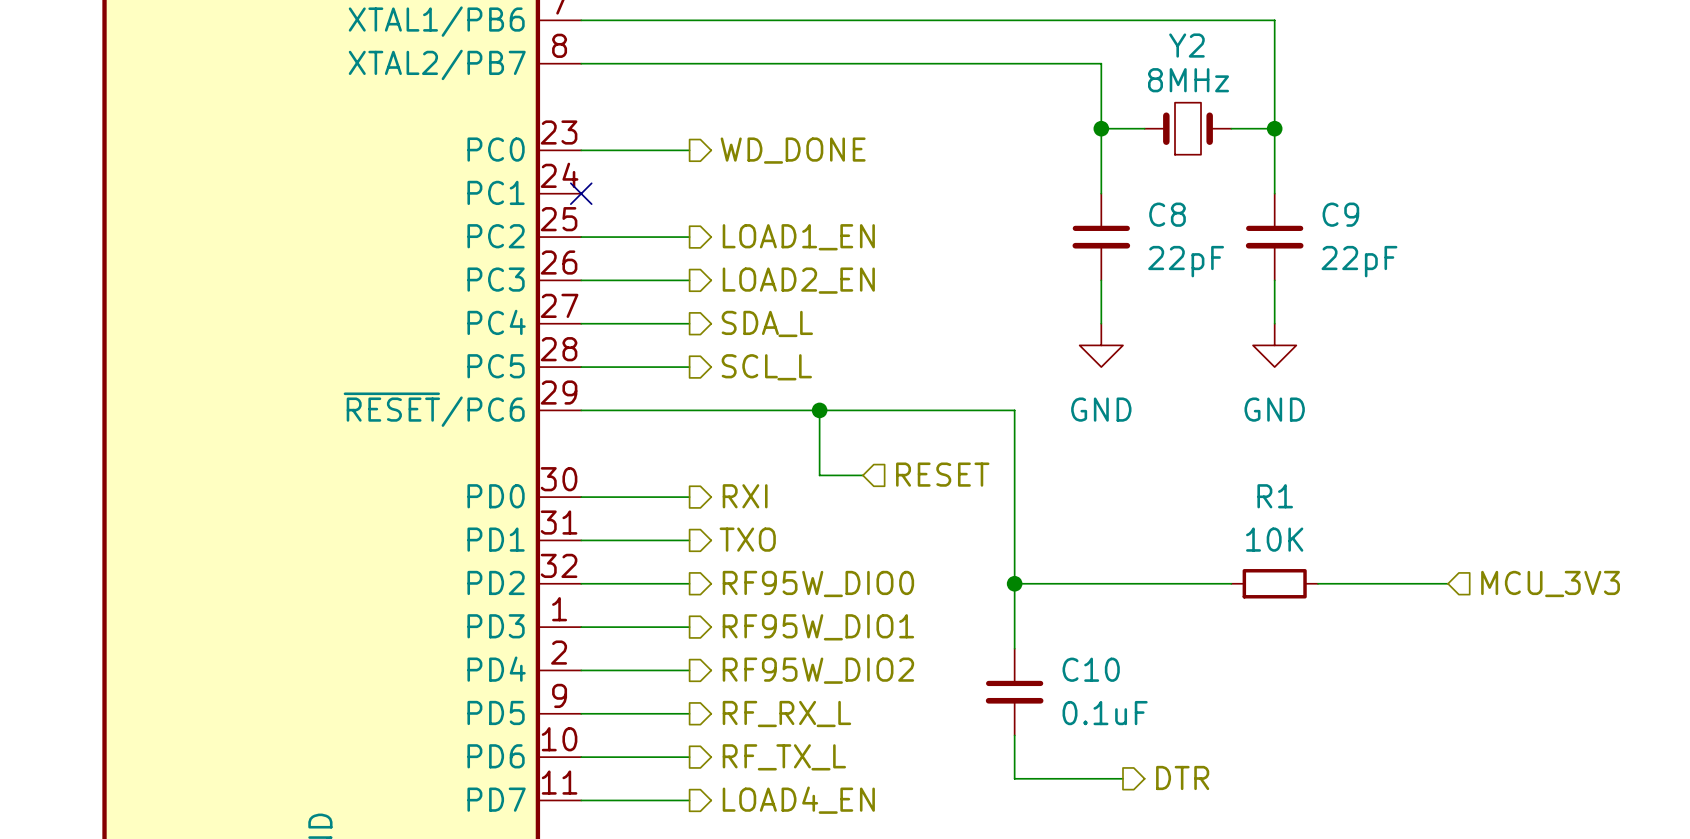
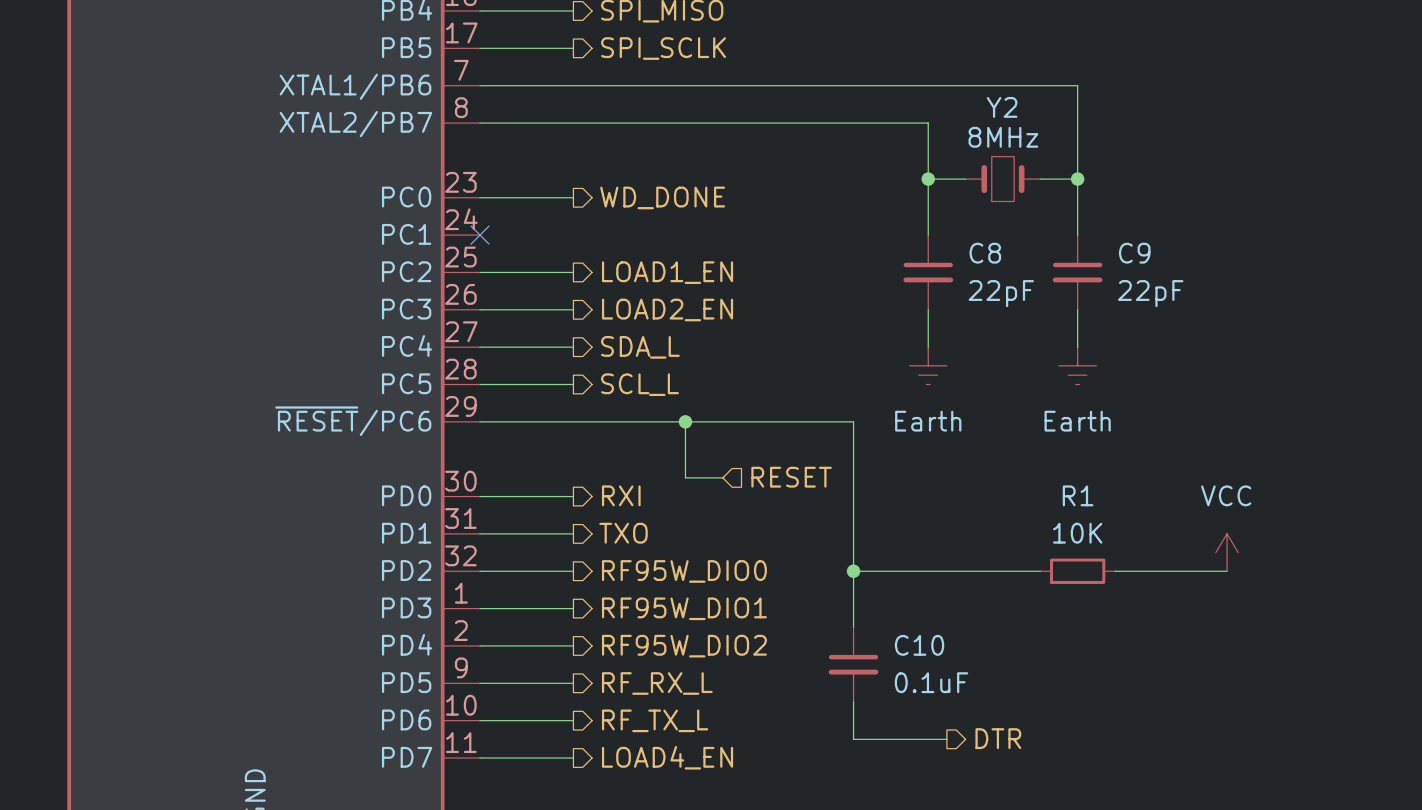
power symbol: GND (1101, 345) -> Earth (928, 365)
power symbol: GND (1274, 345) -> Earth (1077, 365)
power symbol: none -> VCC (1227, 552)
hierarchical label: MCU_3V3 (1550, 583) -> none

